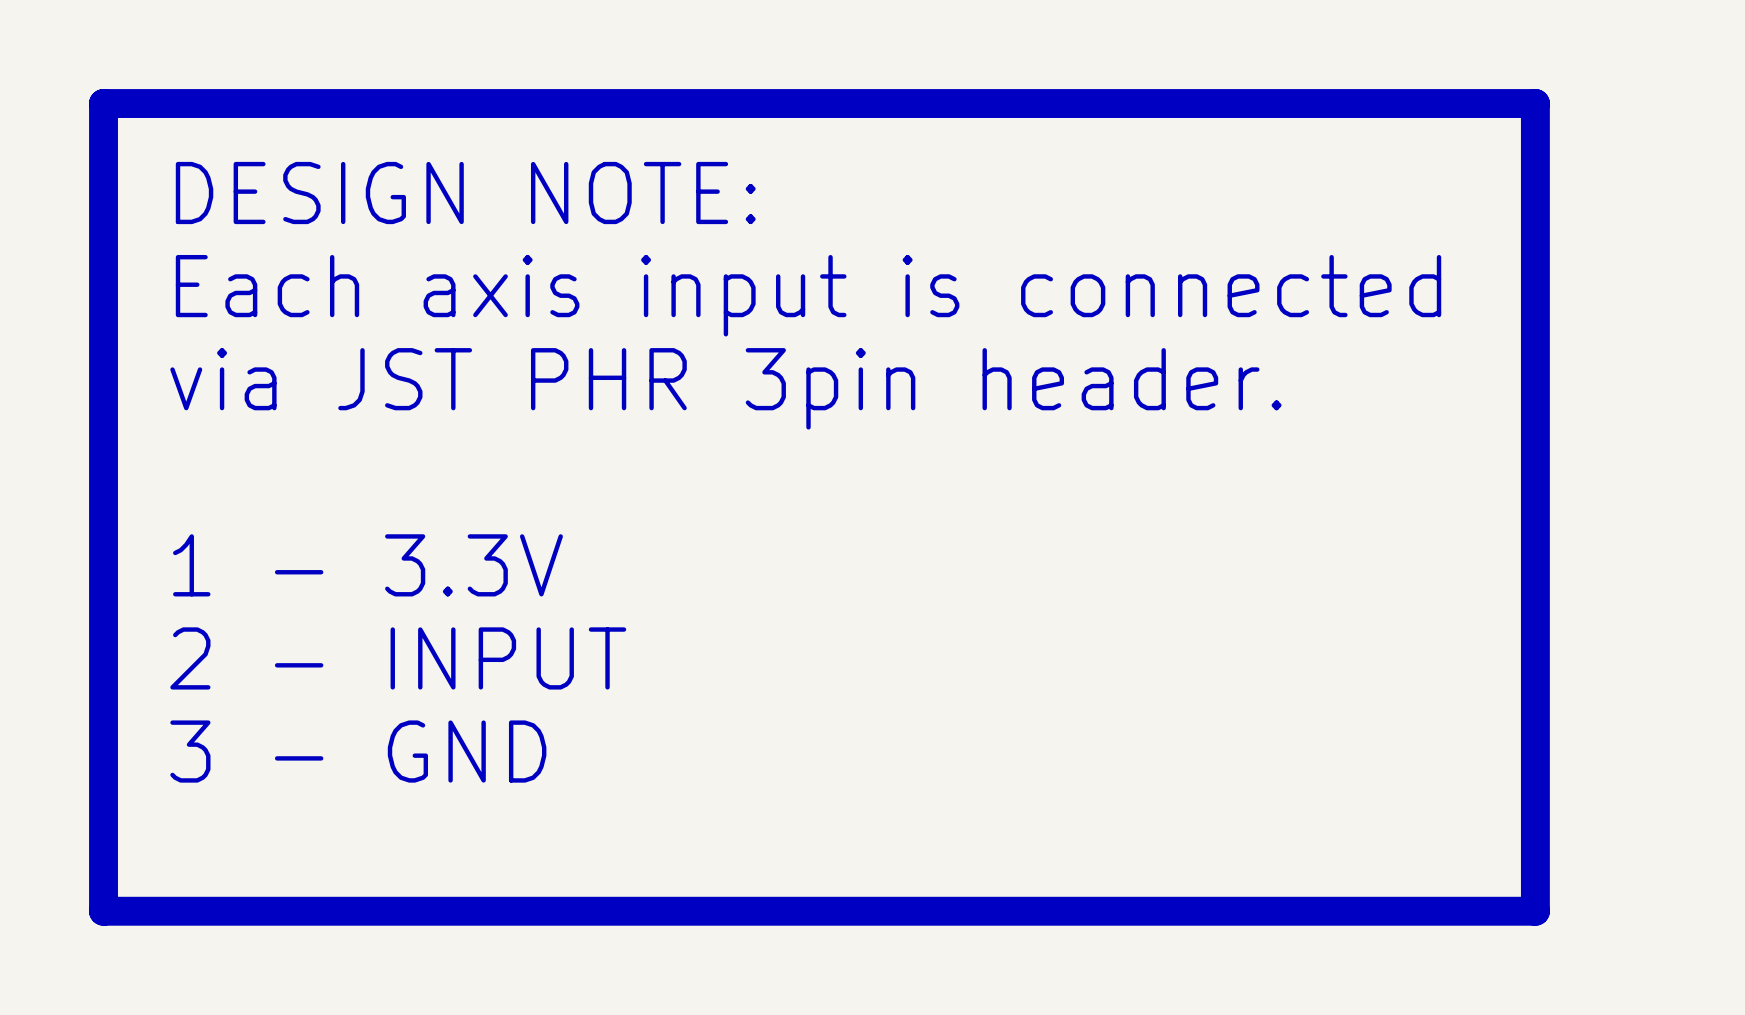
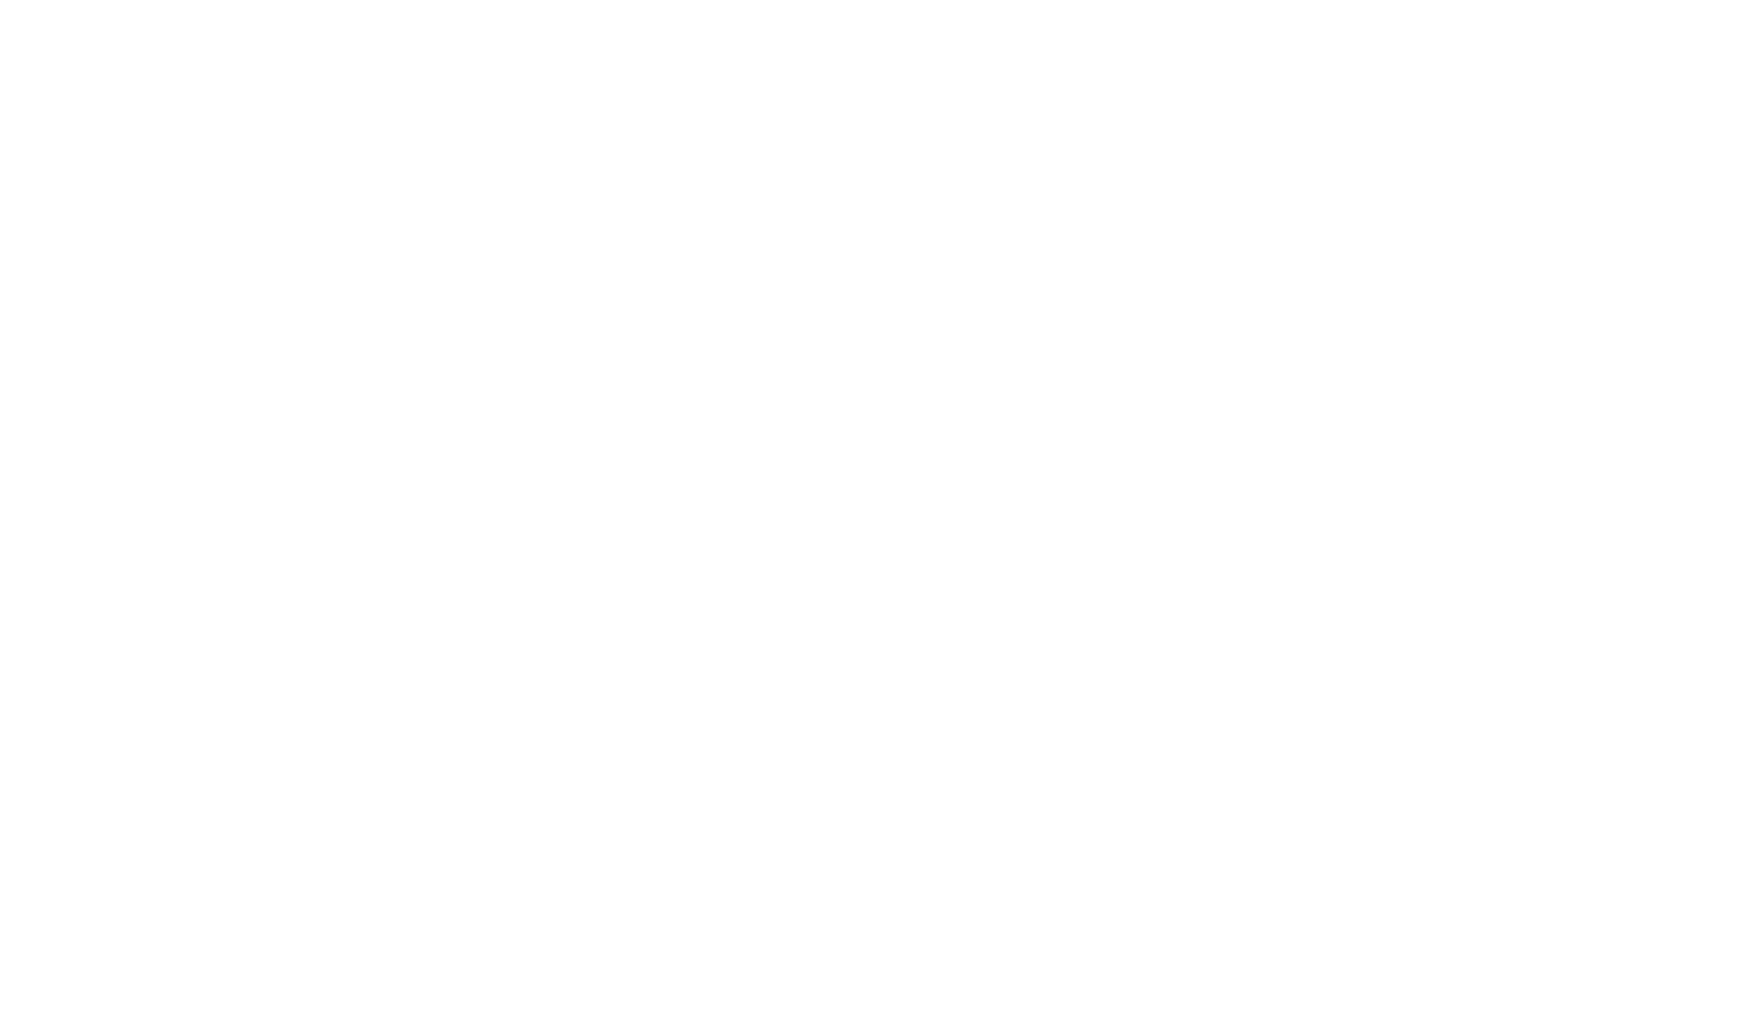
line: (103, 103) (1535, 103) (1535, 911) (103, 911) (103, 103) -> none
text: DESIGN NOTE: (465, 193) -> none
text: Each axis input is connected (808, 295) -> none
text: via JST PHR 3pin header. (725, 388) -> none
text: 1 - 3.3V (367, 565) -> none
text: 2 - INPUT (398, 658) -> none
text: 3 - GND (358, 751) -> none

